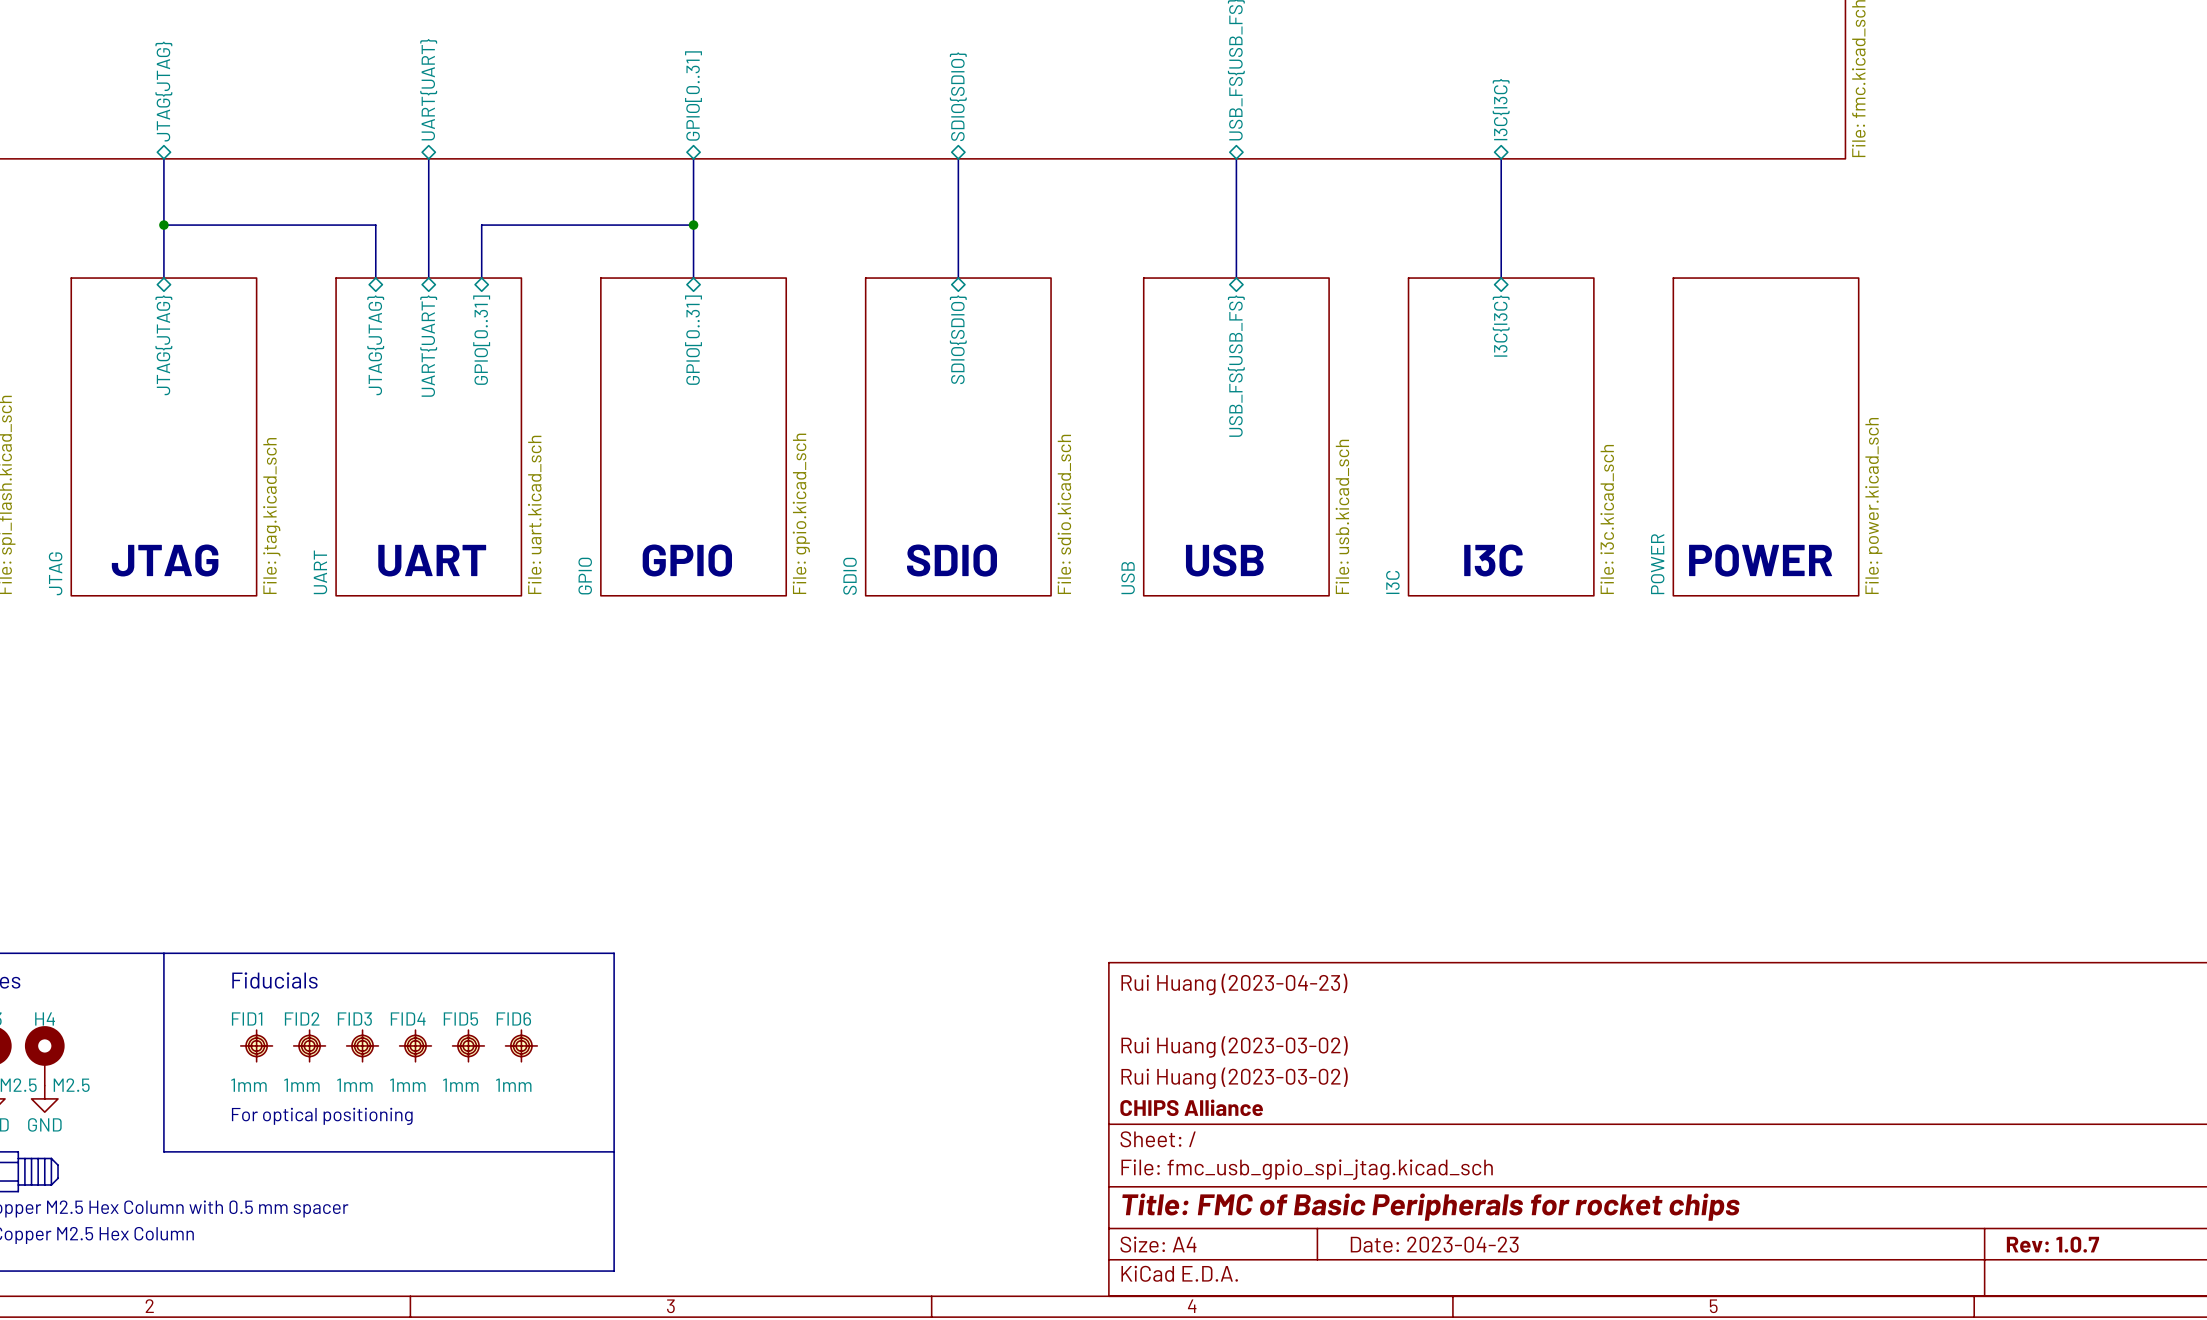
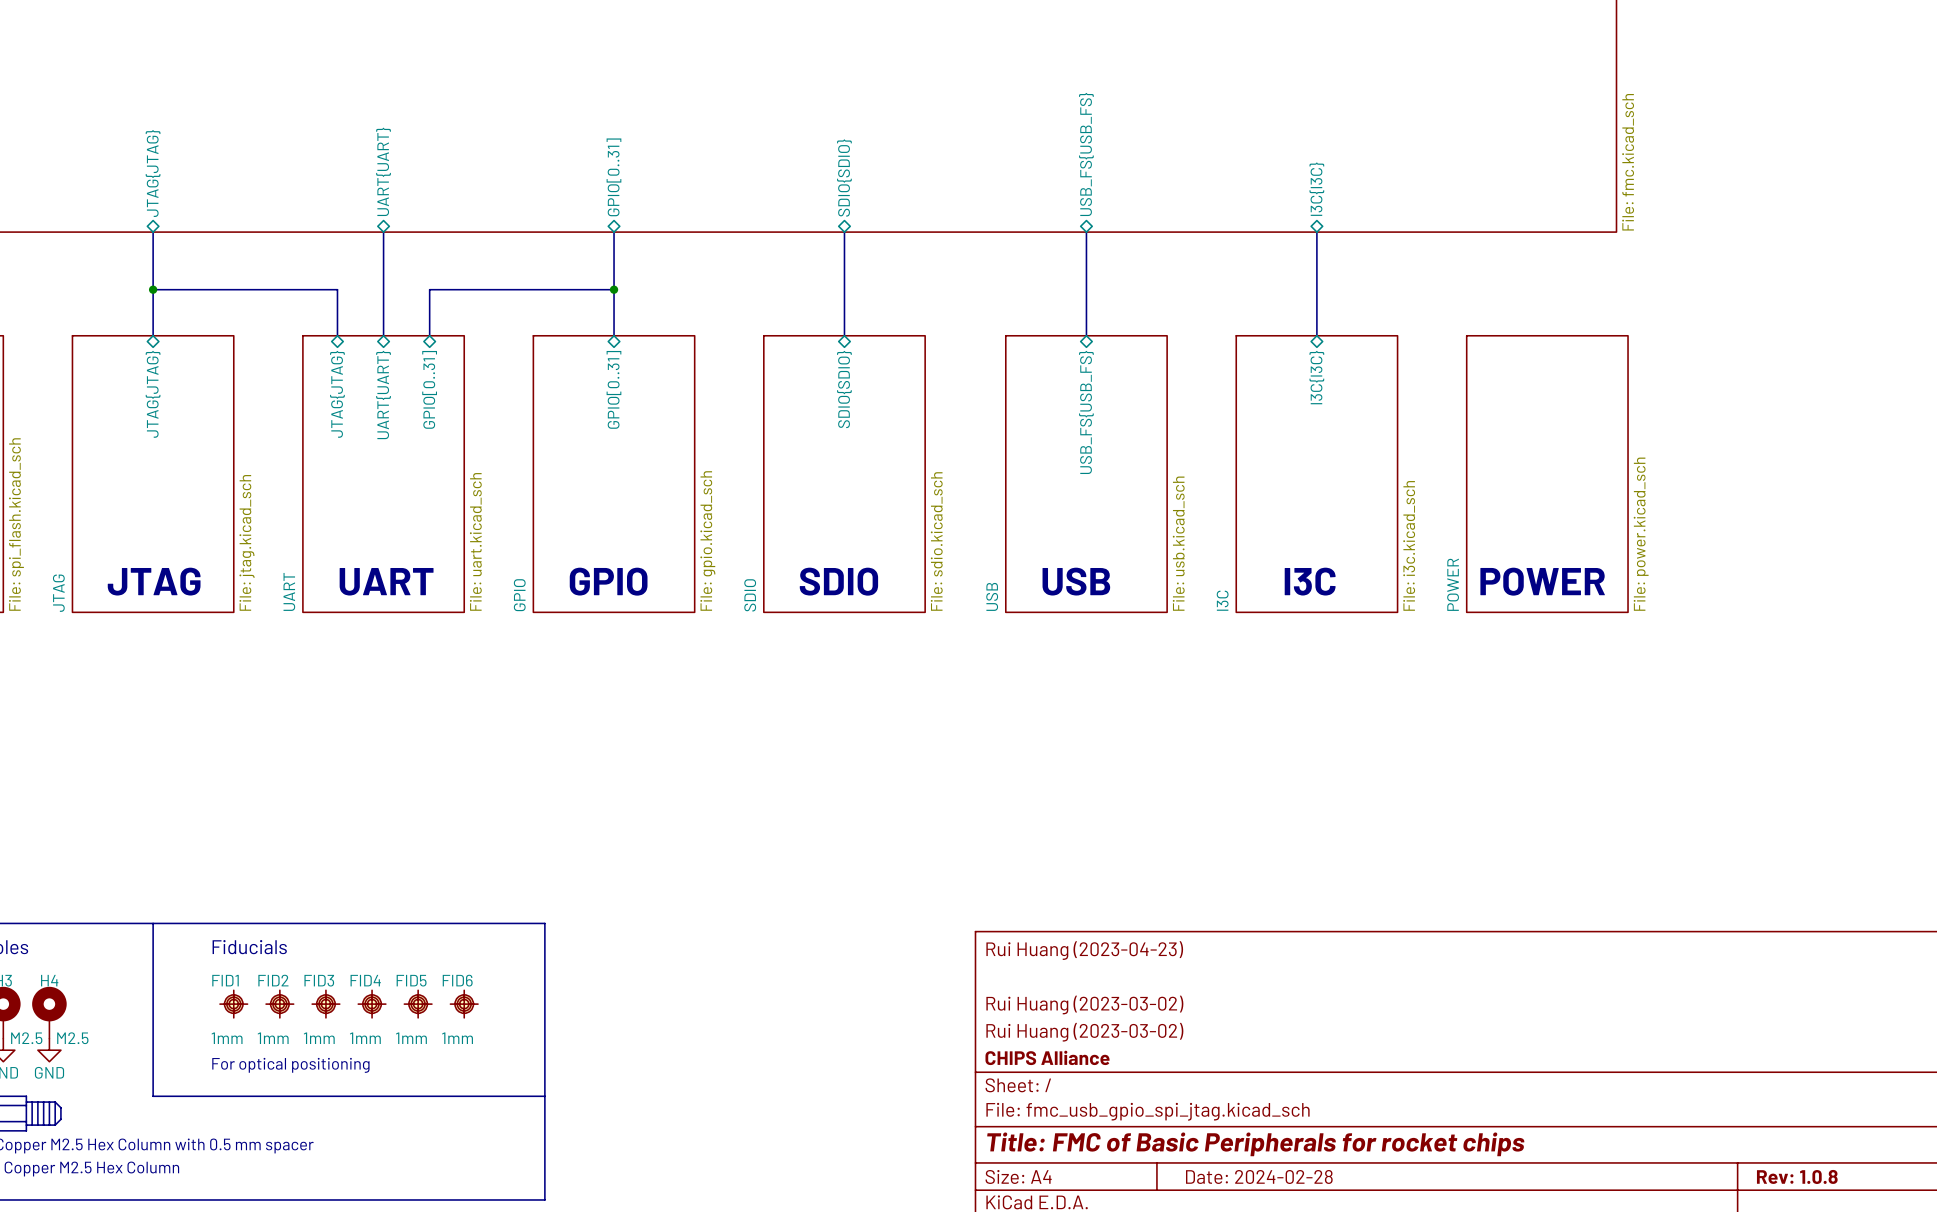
title block: Date: 2023-04-23 (1434, 1244) -> Date: 2024-02-28 (1259, 1176)
title block: Rev: 1.0.7 (2052, 1244) -> Rev: 1.0.8 (1797, 1176)

